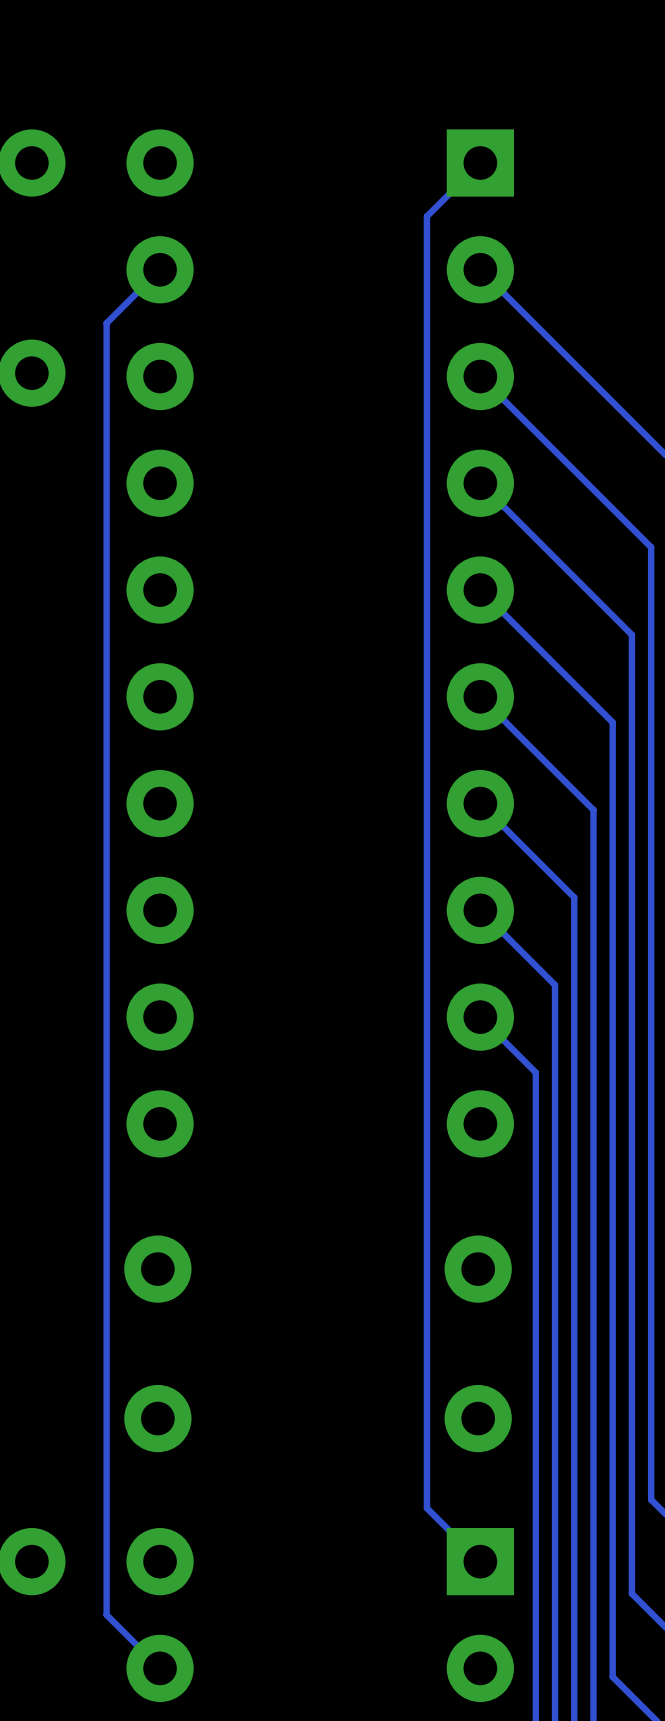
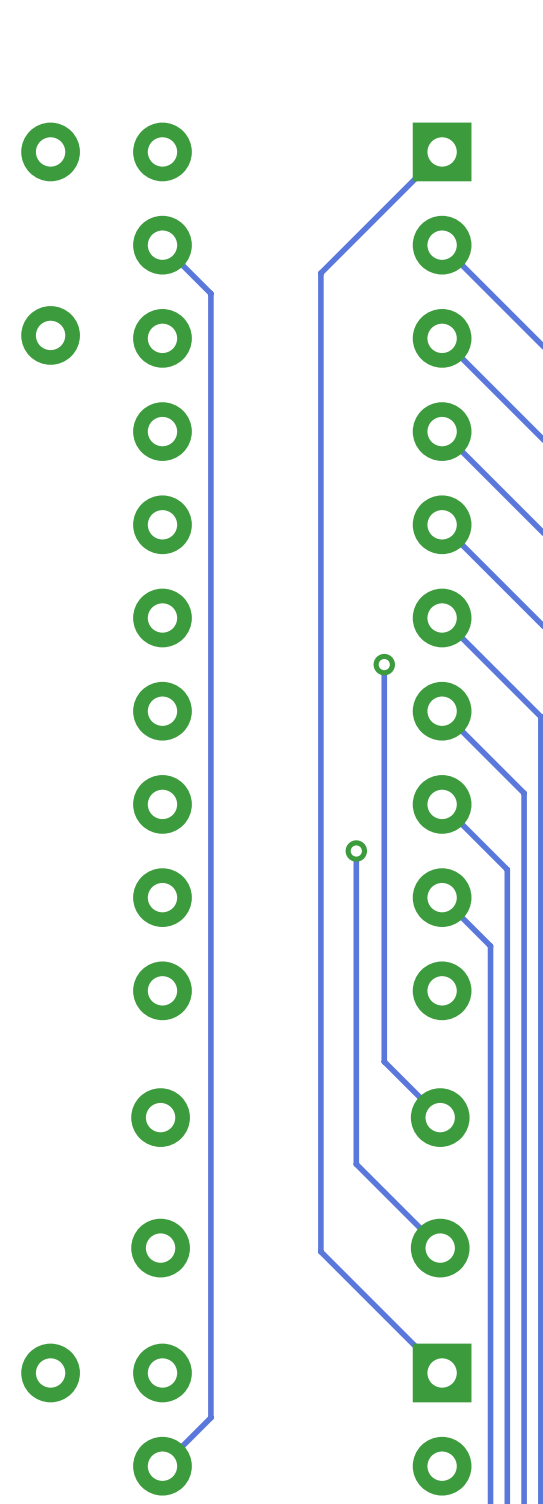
track: (426, 216) (426, 1508) -> (395, 198) (320, 273) (320, 1251) (395, 1326)
track: (160, 269) (106, 323) (106, 1614) (160, 1668) -> (162, 245) (210, 293) (210, 1417) (162, 1466)
track: none -> (384, 664) (384, 1061) (440, 1117)
via: none -> (384, 664)
track: none -> (356, 851) (356, 1164) (440, 1248)
via: none -> (356, 851)

